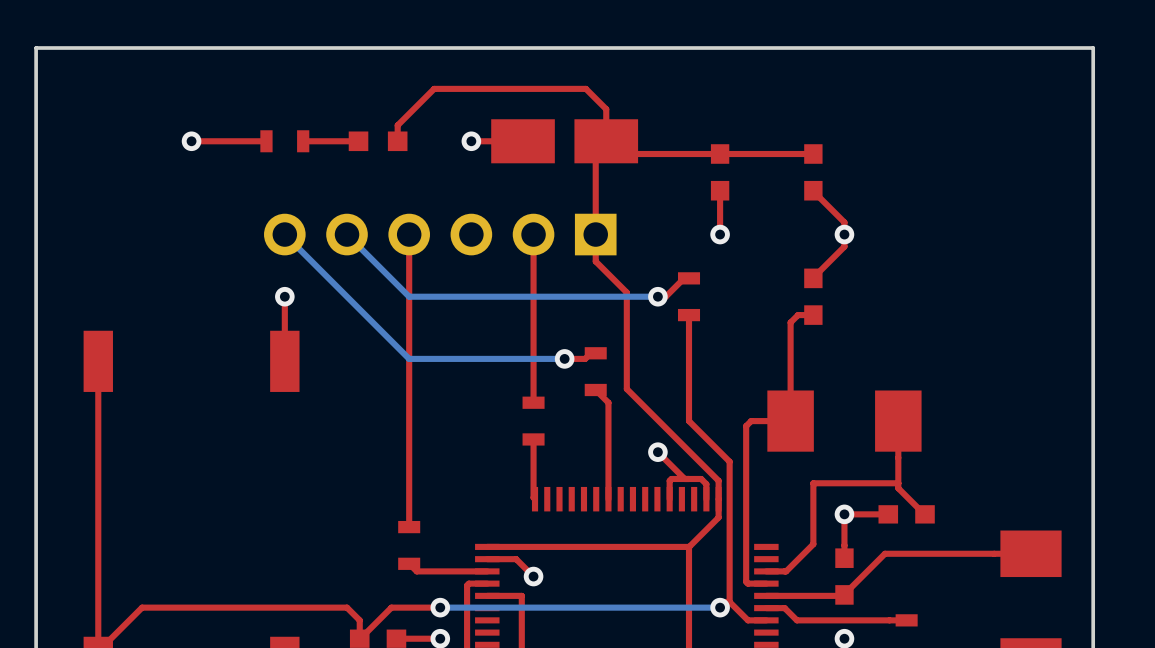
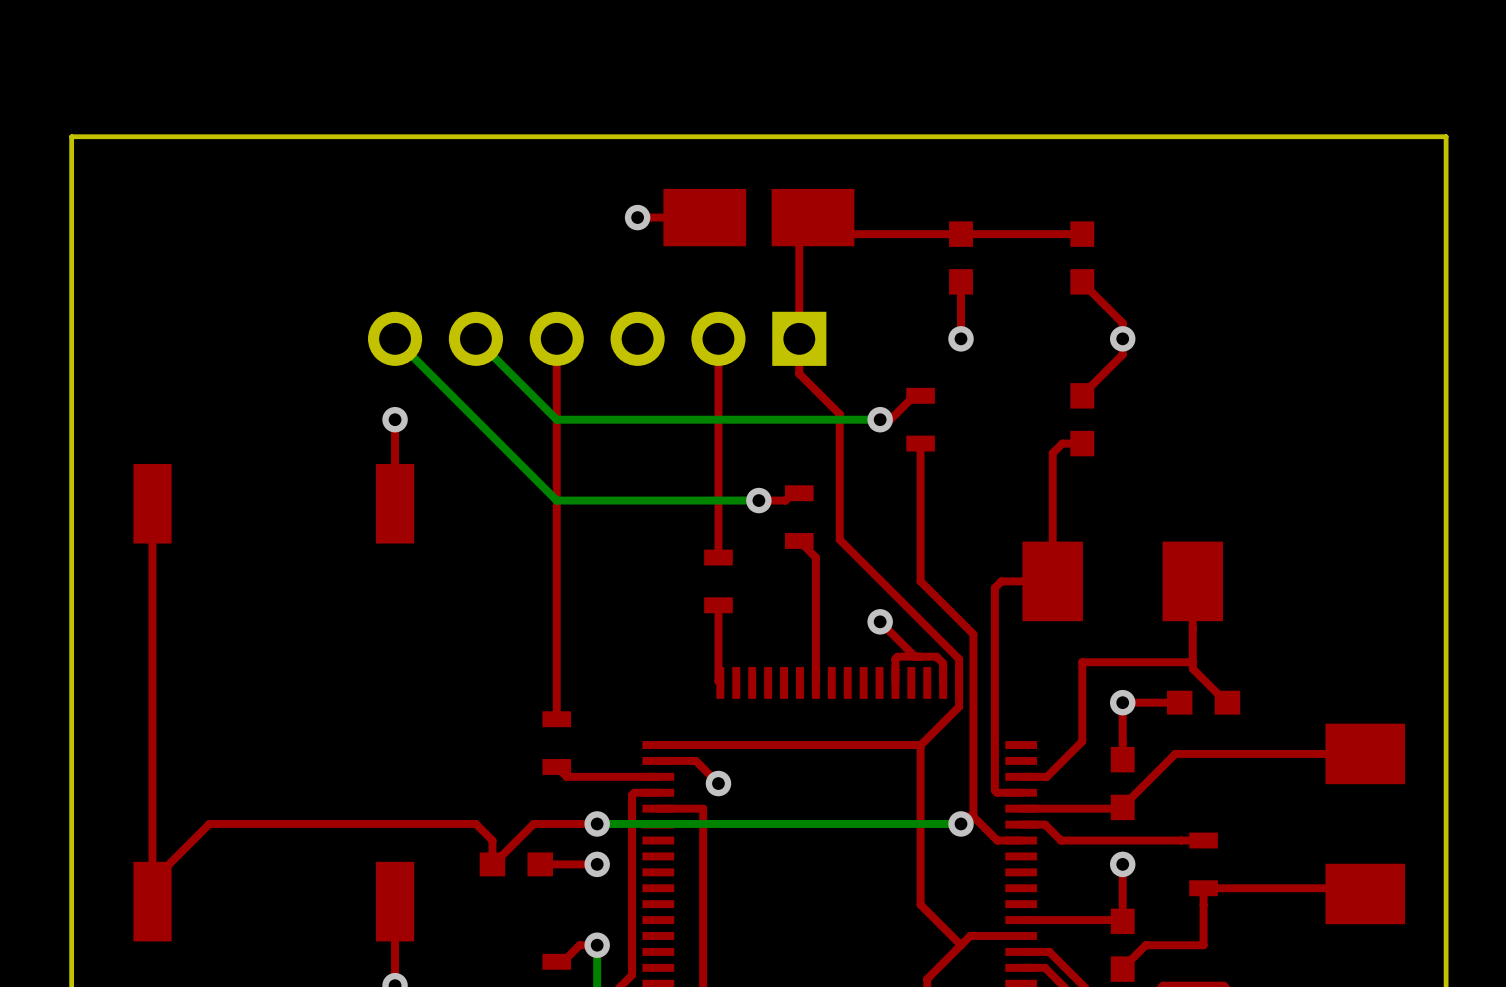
board edge: (1093, 79) (1093, 48) (36, 48) (36, 79) -> (1446, 136) (71, 136)
via: (191, 141) -> none
top track: (266, 141) (191, 141) -> none
part: (284, 141) -> none
top track: (358, 141) (303, 141) -> none
part: (378, 141) -> none
top track: (606, 141) (606, 109) (585, 88) (434, 88) (397, 125) (397, 141) -> none

